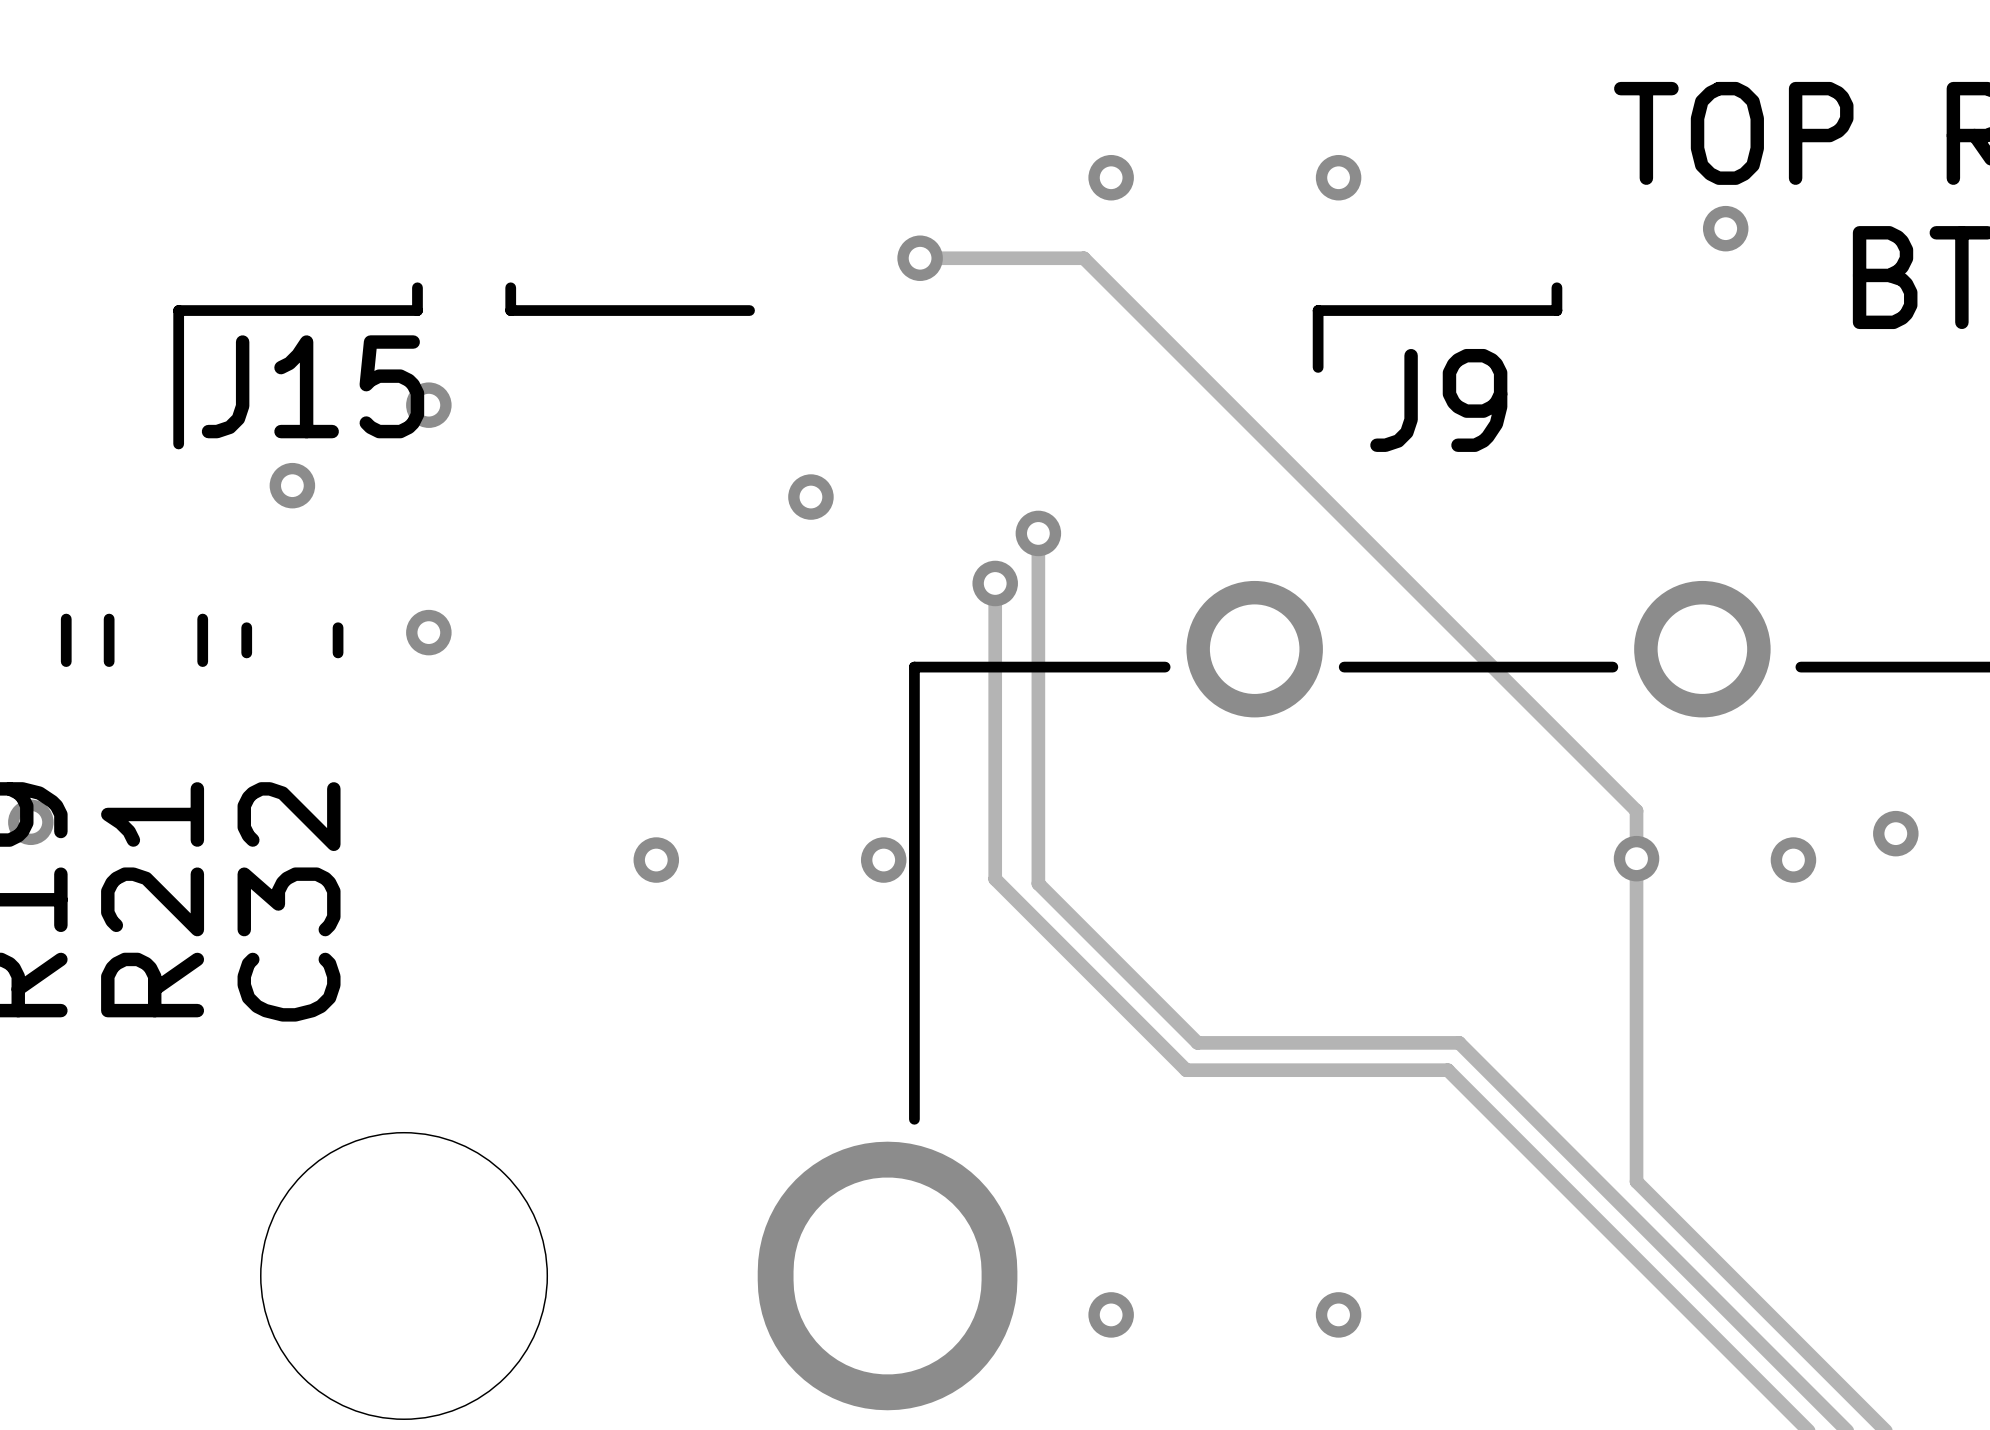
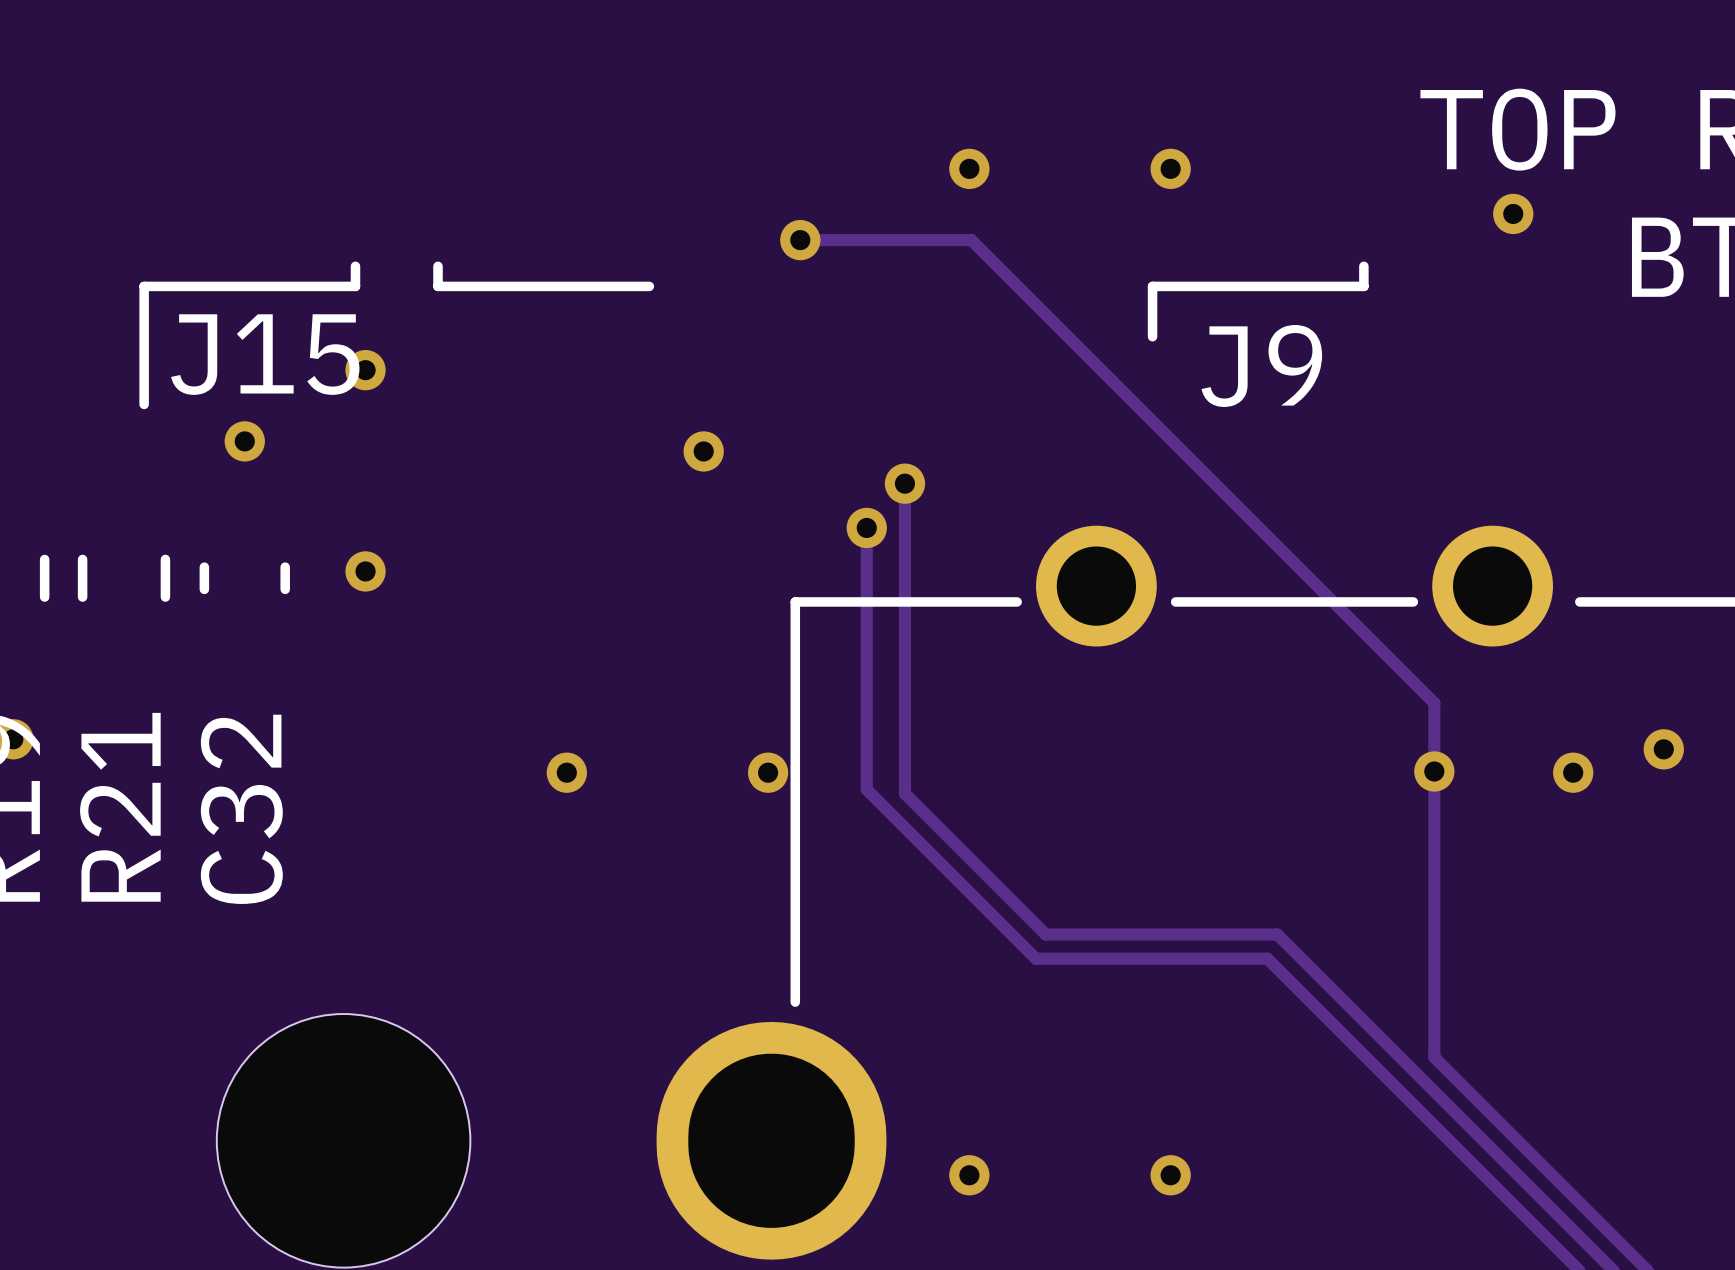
track: (1083, 258) (1636, 810) -> (945, 240) (971, 240) (1434, 703) (1434, 729)

